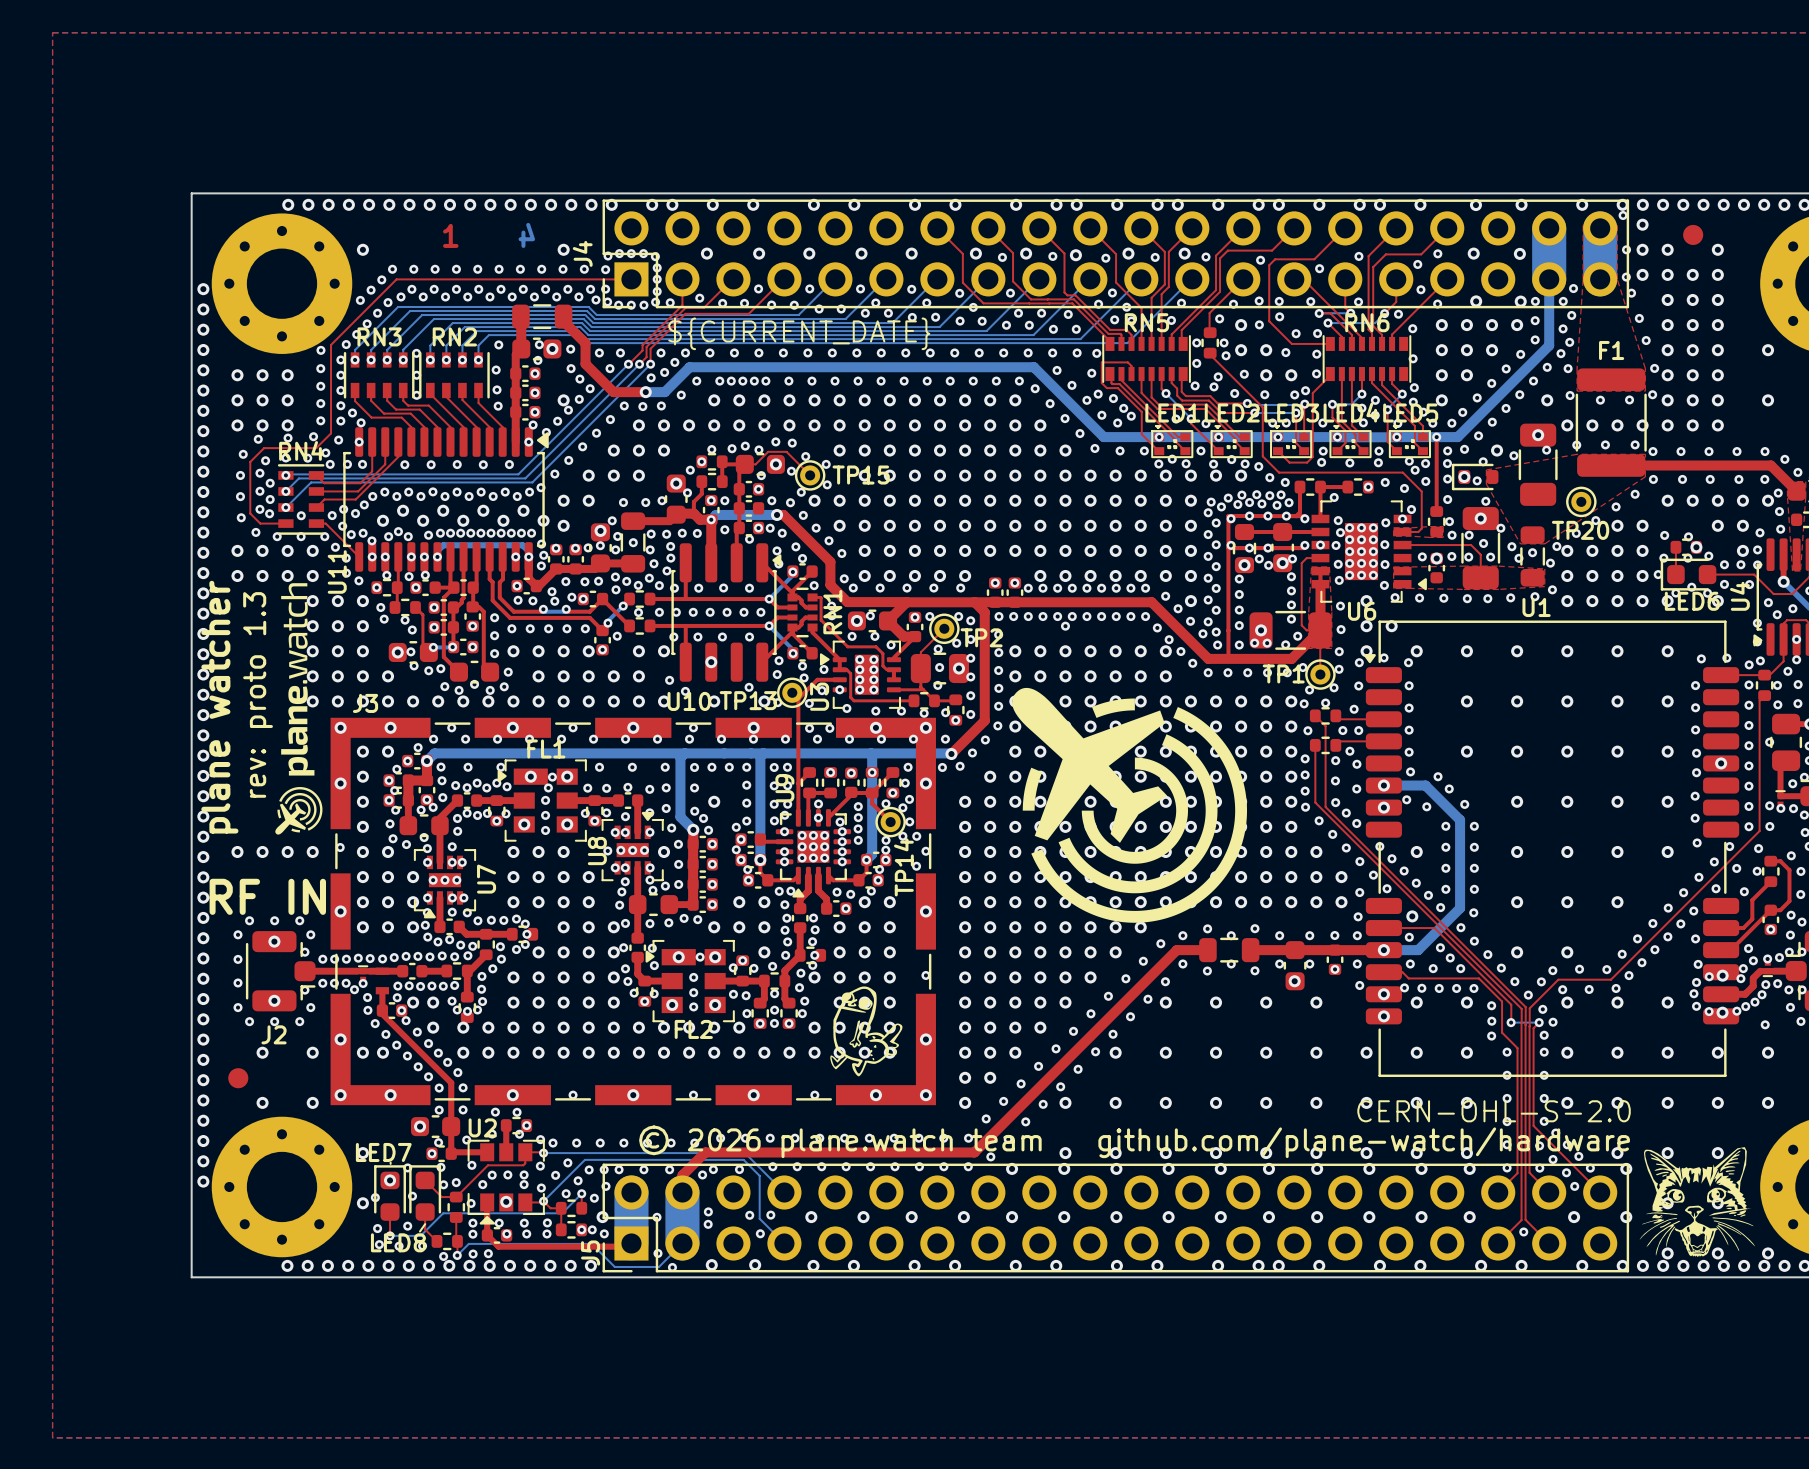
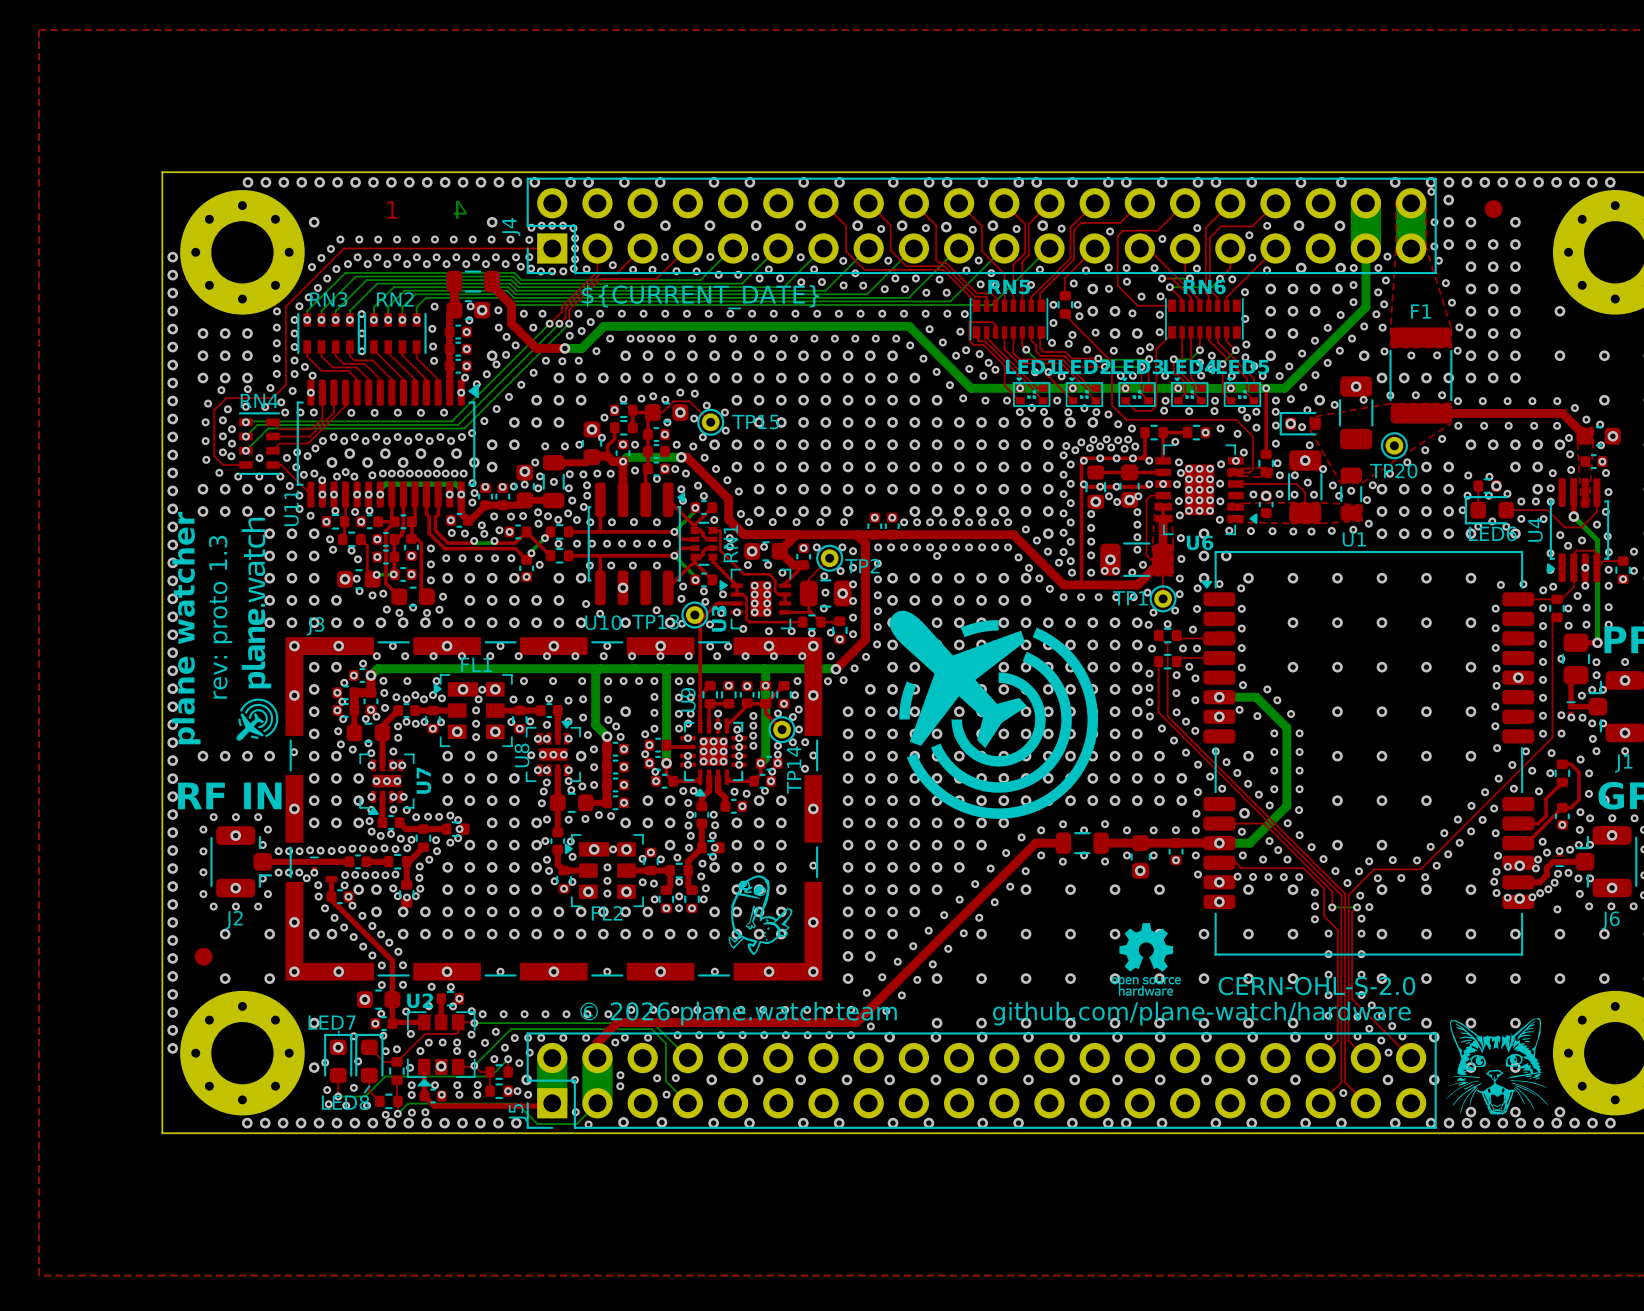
drawing: none -> [1111, 923, 1181, 996]

